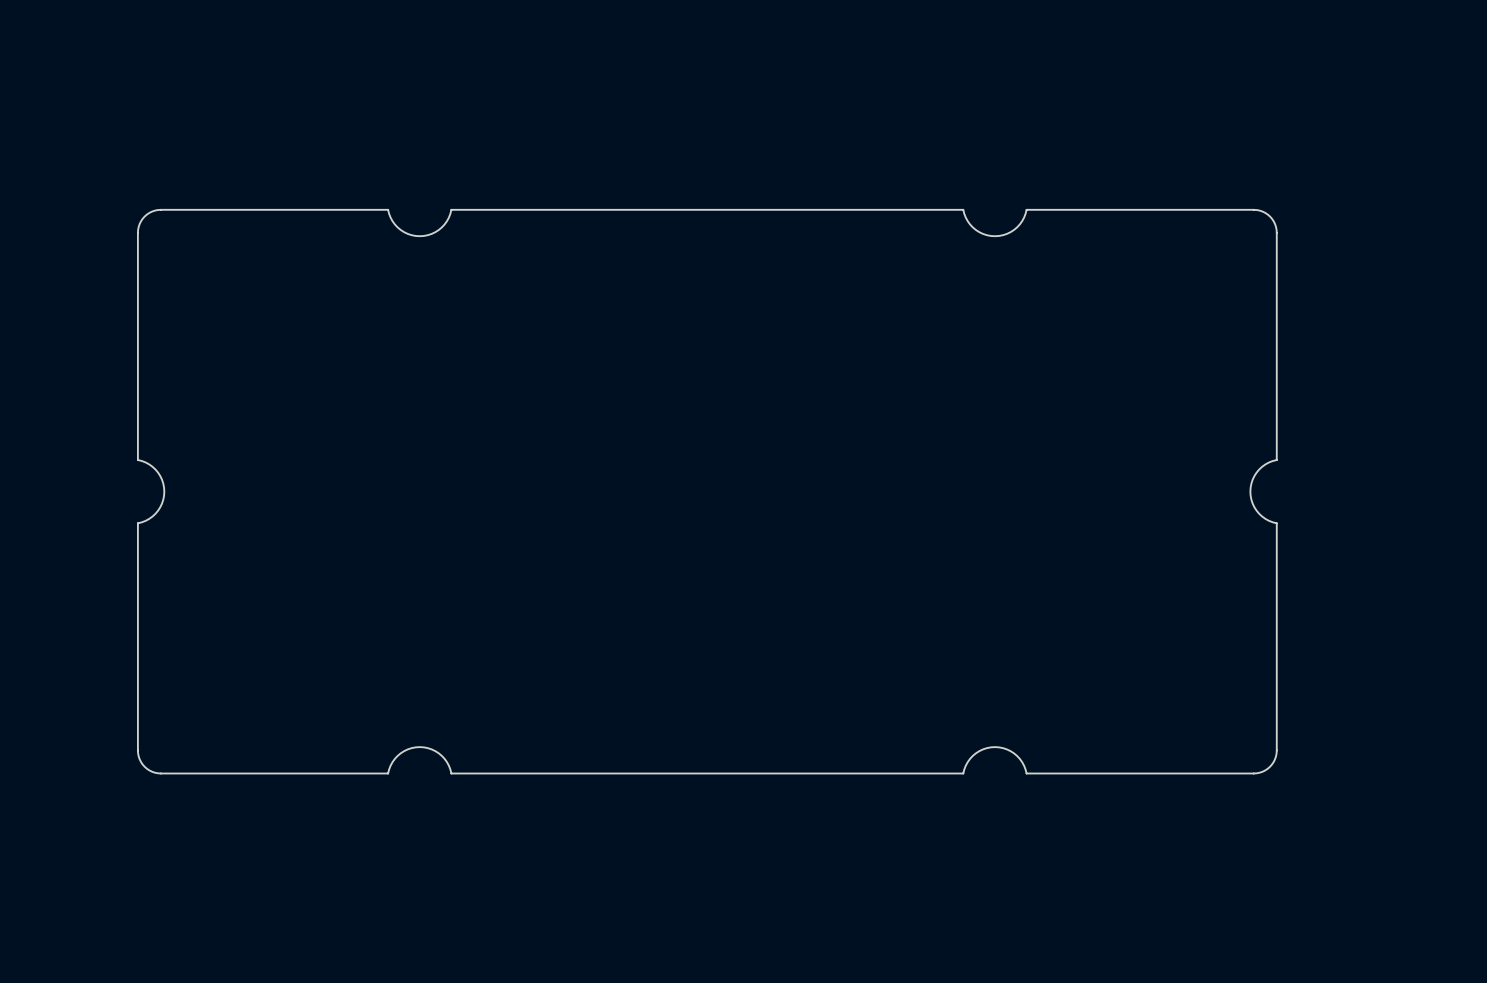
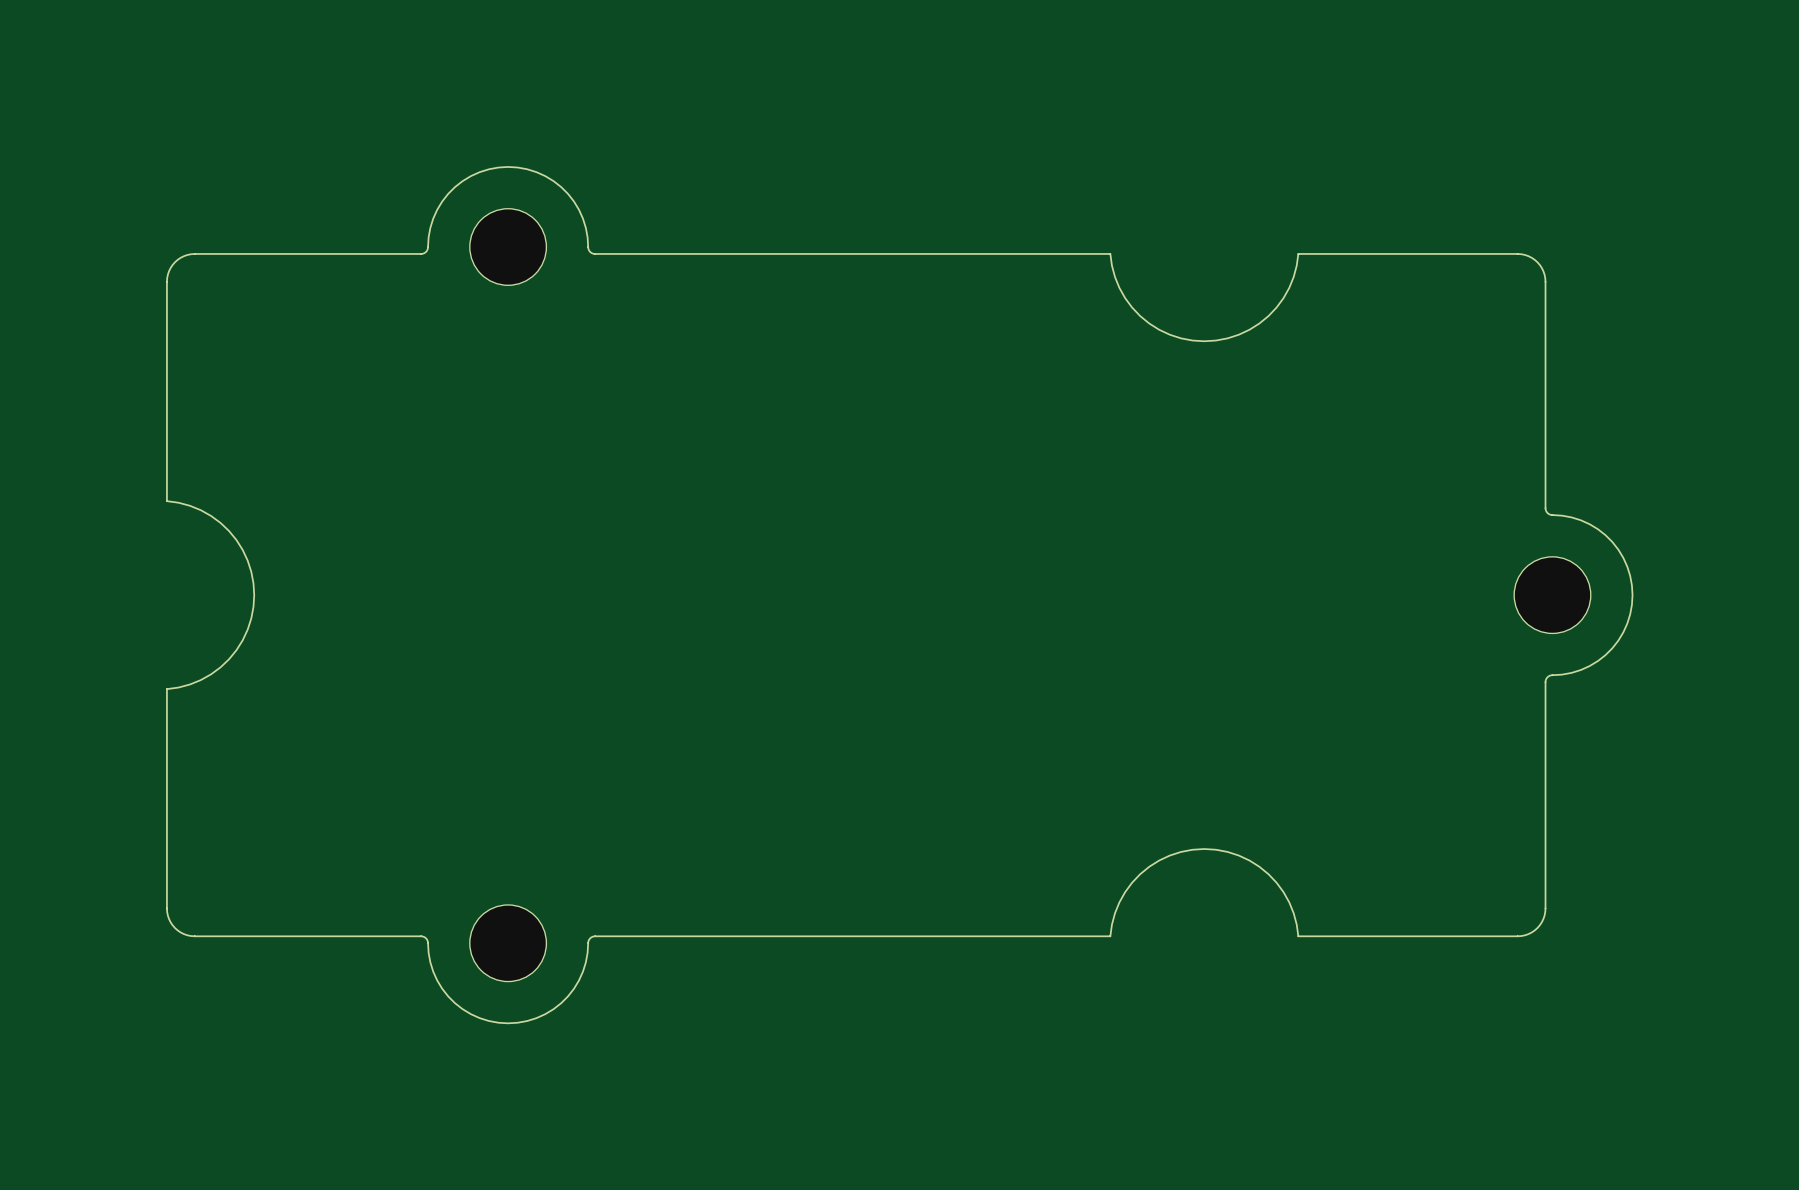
part: none -> (508, 247)
board edge: (491, 209) (451, 209) (447, 221) (438, 230) (427, 235) (419, 236) (407, 233) (397, 227) (392, 221) (388, 209) (347, 209) -> (595, 253) (588, 249) (582, 218) (568, 193) (545, 176) (527, 169) (508, 166) (488, 169) (470, 176) (448, 193) (433, 218) (427, 249) (421, 253)
board edge: (1072, 209) (1026, 209) (1022, 221) (1013, 230) (1002, 235) (994, 236) (983, 233) (972, 227) (965, 217) (963, 209) (917, 209) -> (1298, 253) (1289, 287) (1268, 316) (1238, 334) (1204, 341) (1169, 334) (1140, 316) (1119, 287) (1110, 253)
board edge: (137, 414) (137, 460) (149, 464) (158, 472) (163, 483) (164, 491) (162, 503) (155, 513) (149, 518) (137, 523) (137, 569) -> (166, 501) (200, 510) (229, 531) (247, 560) (254, 595) (247, 629) (229, 659) (200, 680) (166, 689)
board edge: (1276, 419) (1276, 460) (1265, 464) (1256, 472) (1251, 483) (1250, 491) (1251, 499) (1256, 510) (1265, 518) (1276, 523) (1276, 563) -> (1545, 508) (1549, 514) (1571, 517) (1589, 524) (1612, 542) (1627, 566) (1632, 595) (1627, 623) (1612, 648) (1589, 666) (1571, 672) (1549, 675) (1545, 682)
part: none -> (1552, 595)
board edge: (491, 773) (451, 773) (447, 762) (438, 753) (431, 749) (419, 747) (407, 749) (400, 753) (392, 762) (388, 773) (347, 773) -> (595, 936) (588, 940) (585, 962) (579, 980) (561, 1003) (536, 1018) (508, 1023) (488, 1021) (470, 1014) (448, 996) (433, 971) (427, 940) (421, 936)
board edge: (1072, 773) (1026, 773) (1022, 762) (1013, 753) (1002, 748) (994, 747) (986, 748) (975, 753) (967, 762) (963, 773) (917, 773) -> (1298, 936) (1289, 902) (1268, 874) (1238, 855) (1204, 849) (1169, 855) (1140, 874) (1119, 902) (1110, 936)
part: none -> (508, 943)

